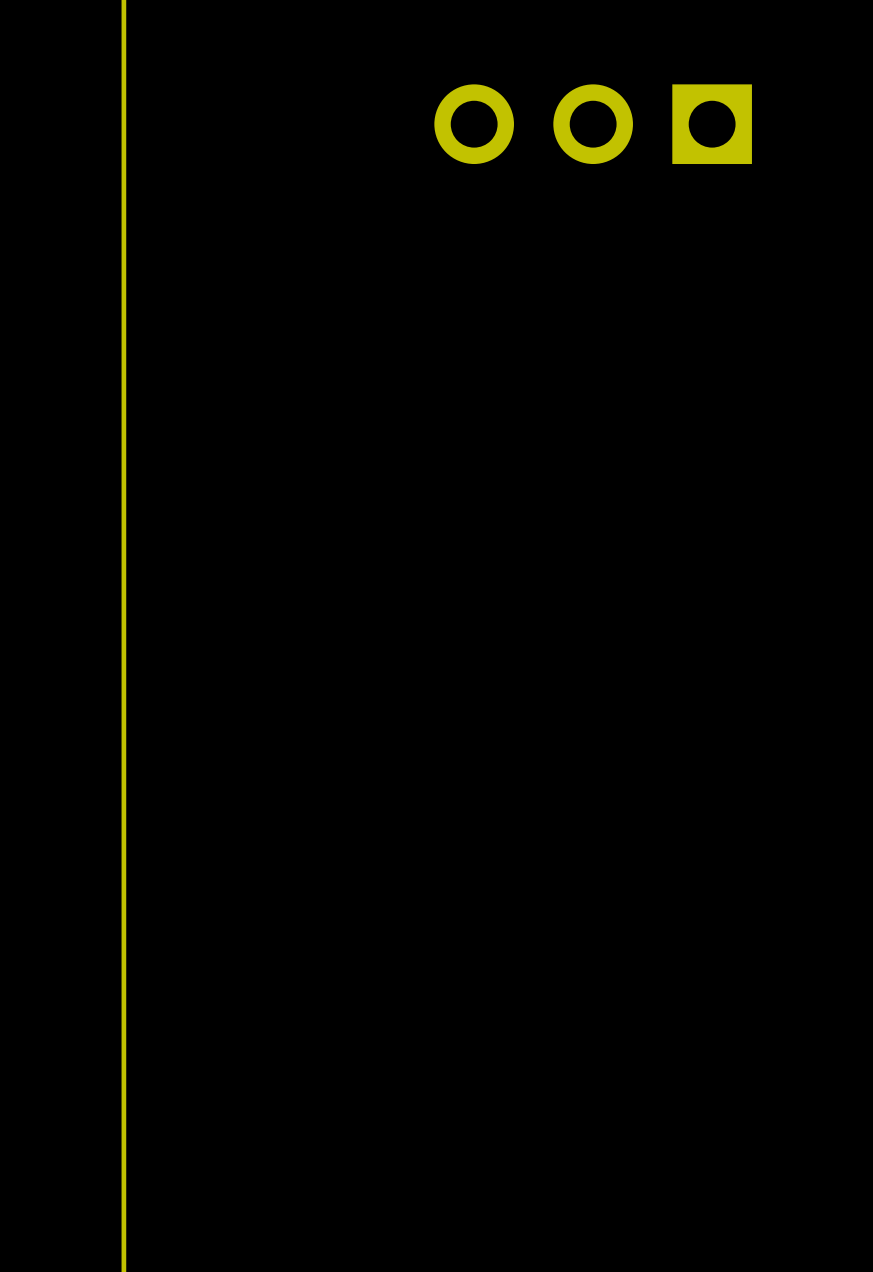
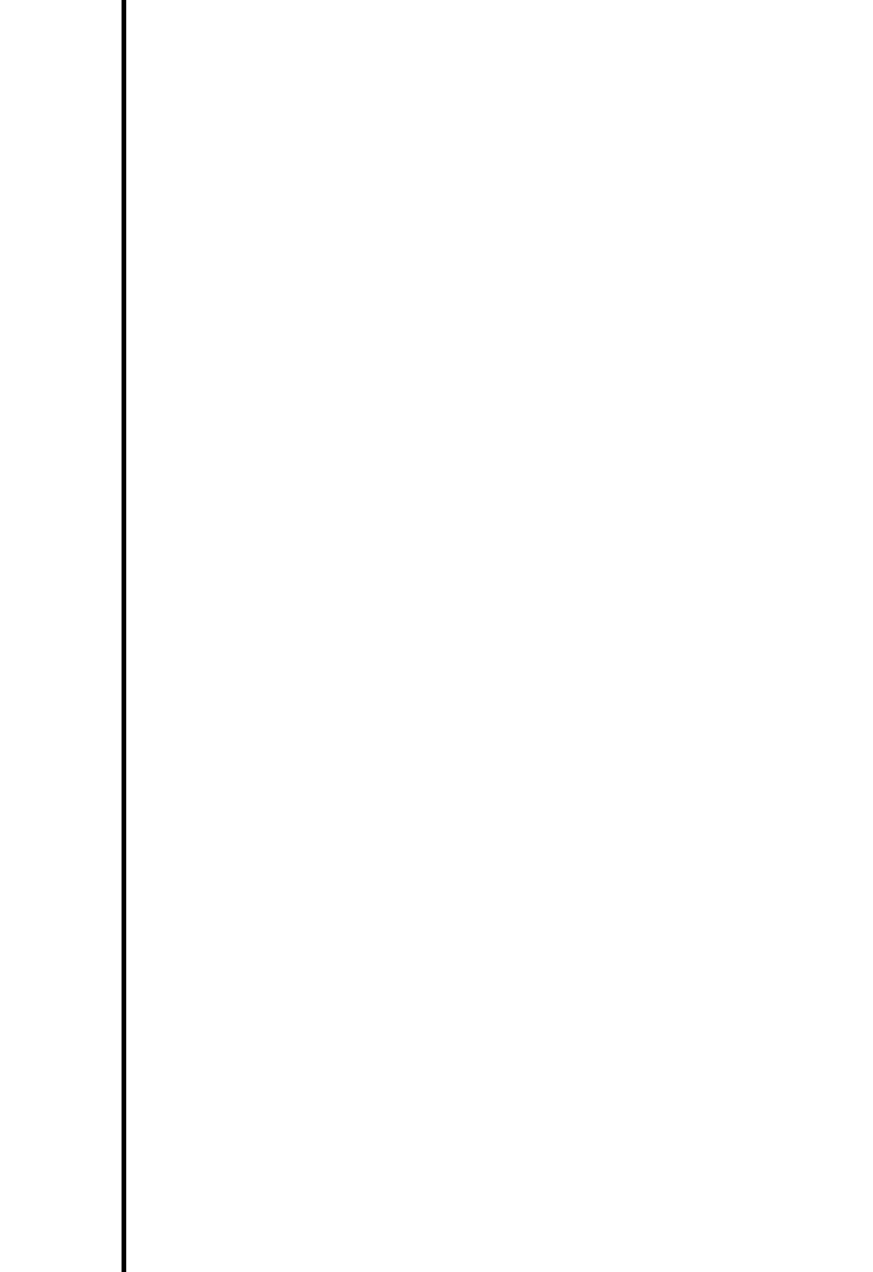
part: (593, 124) -> none

